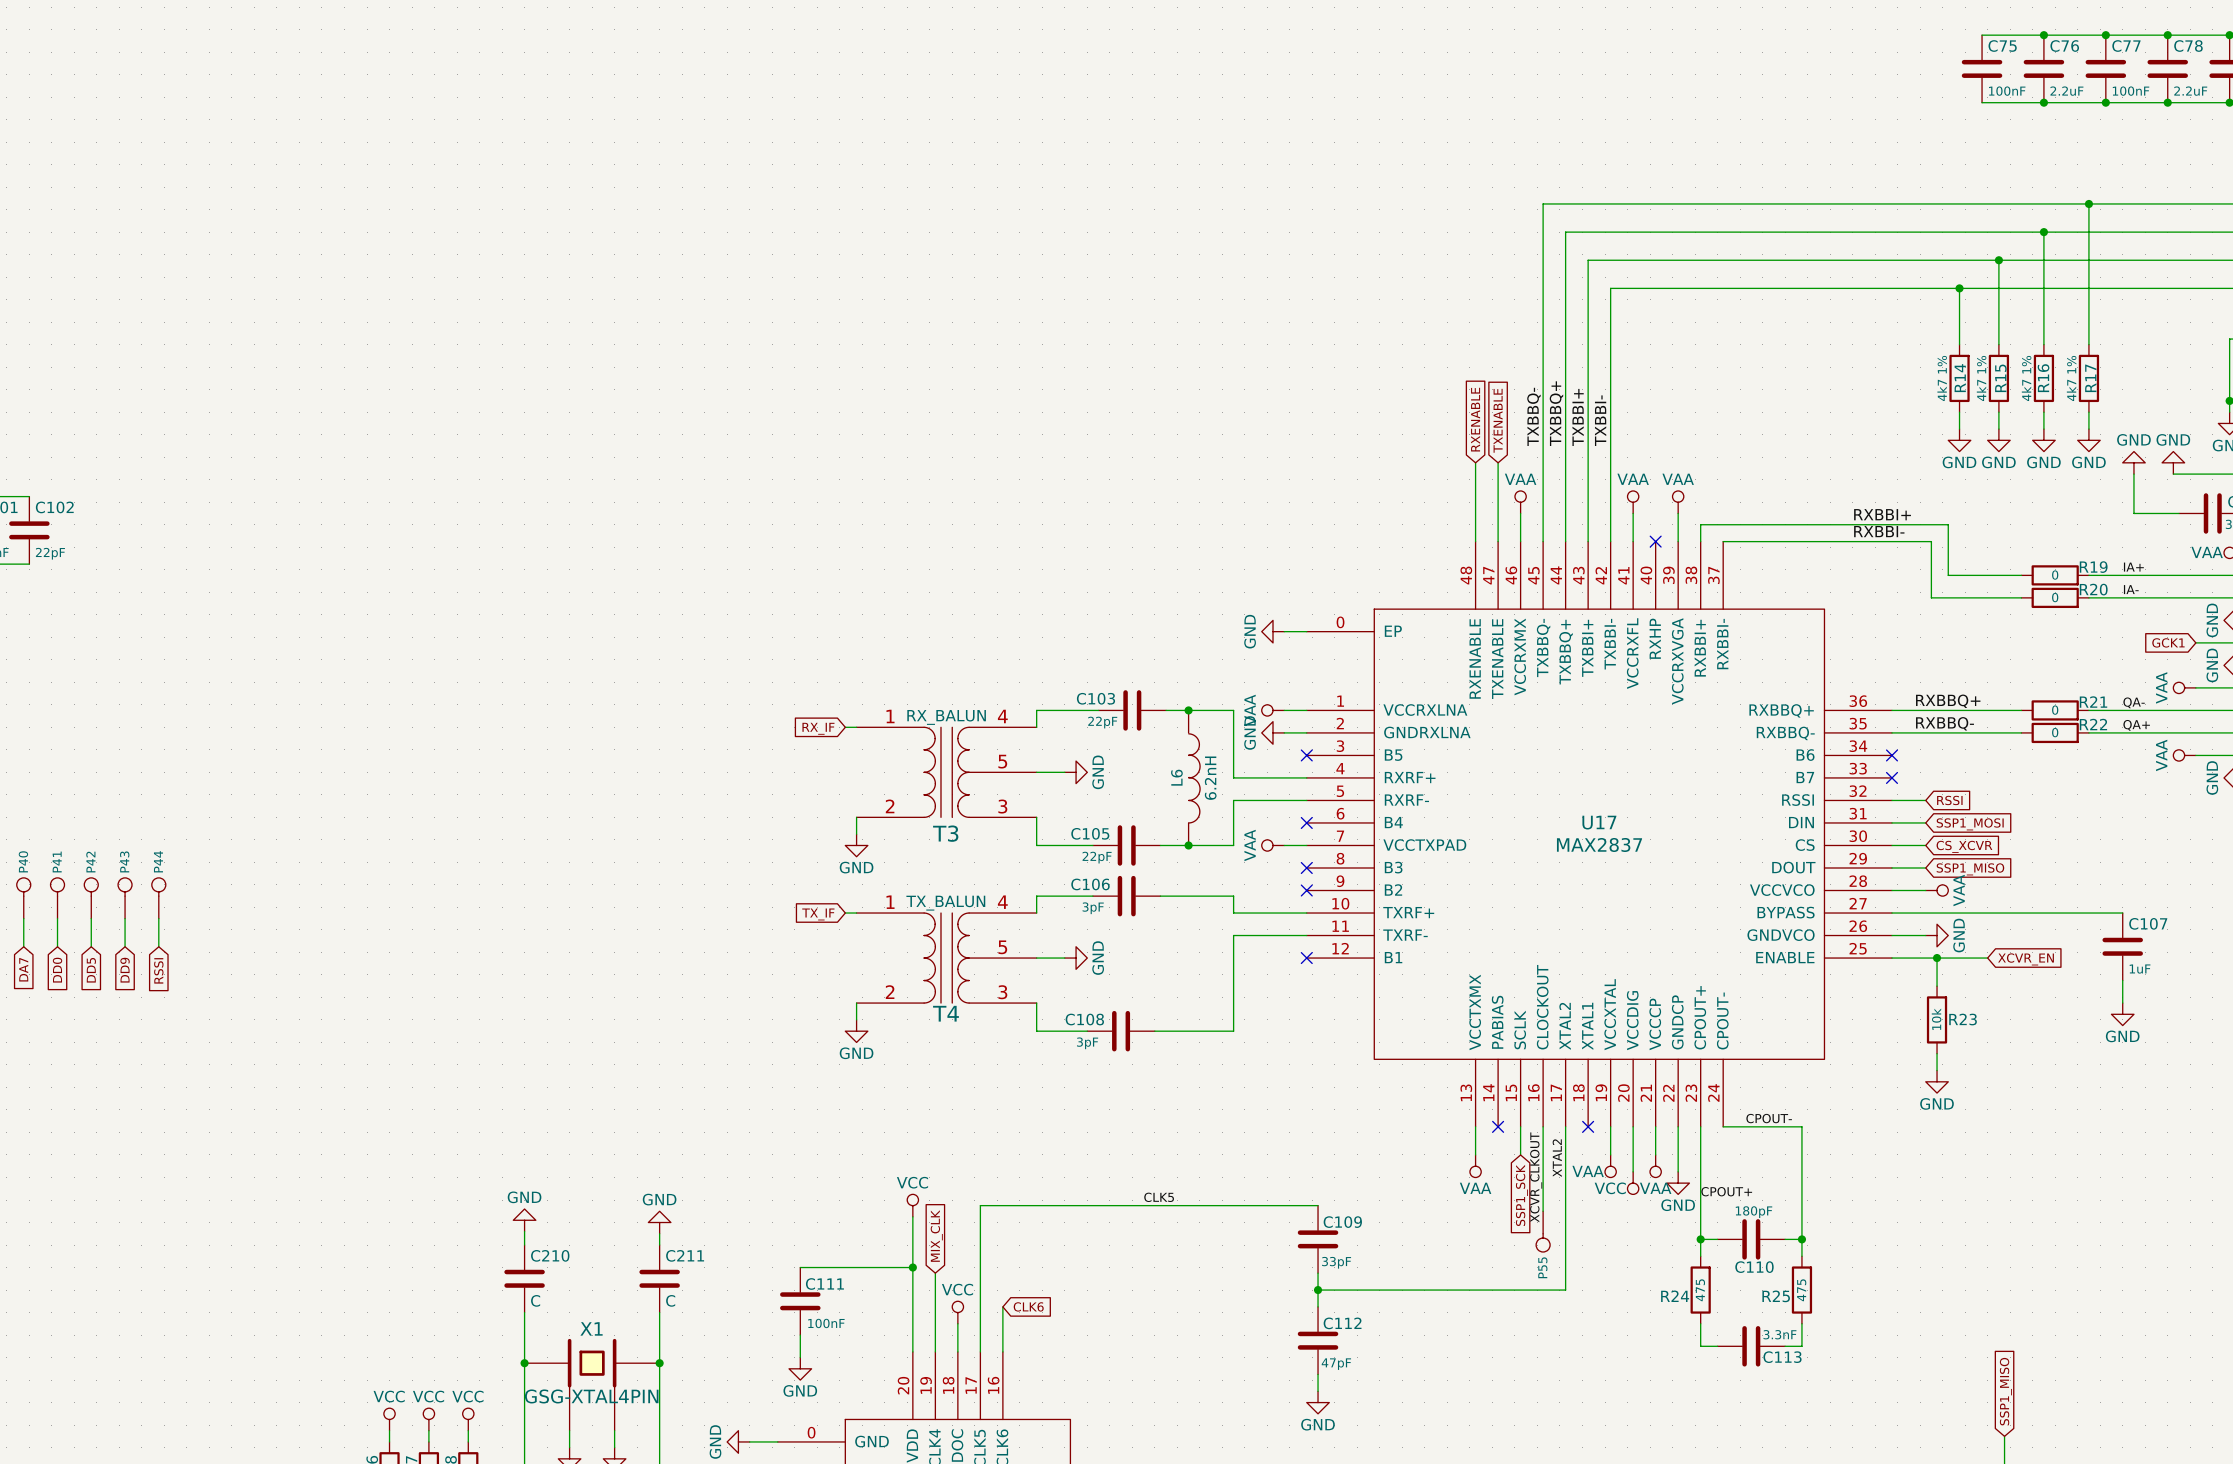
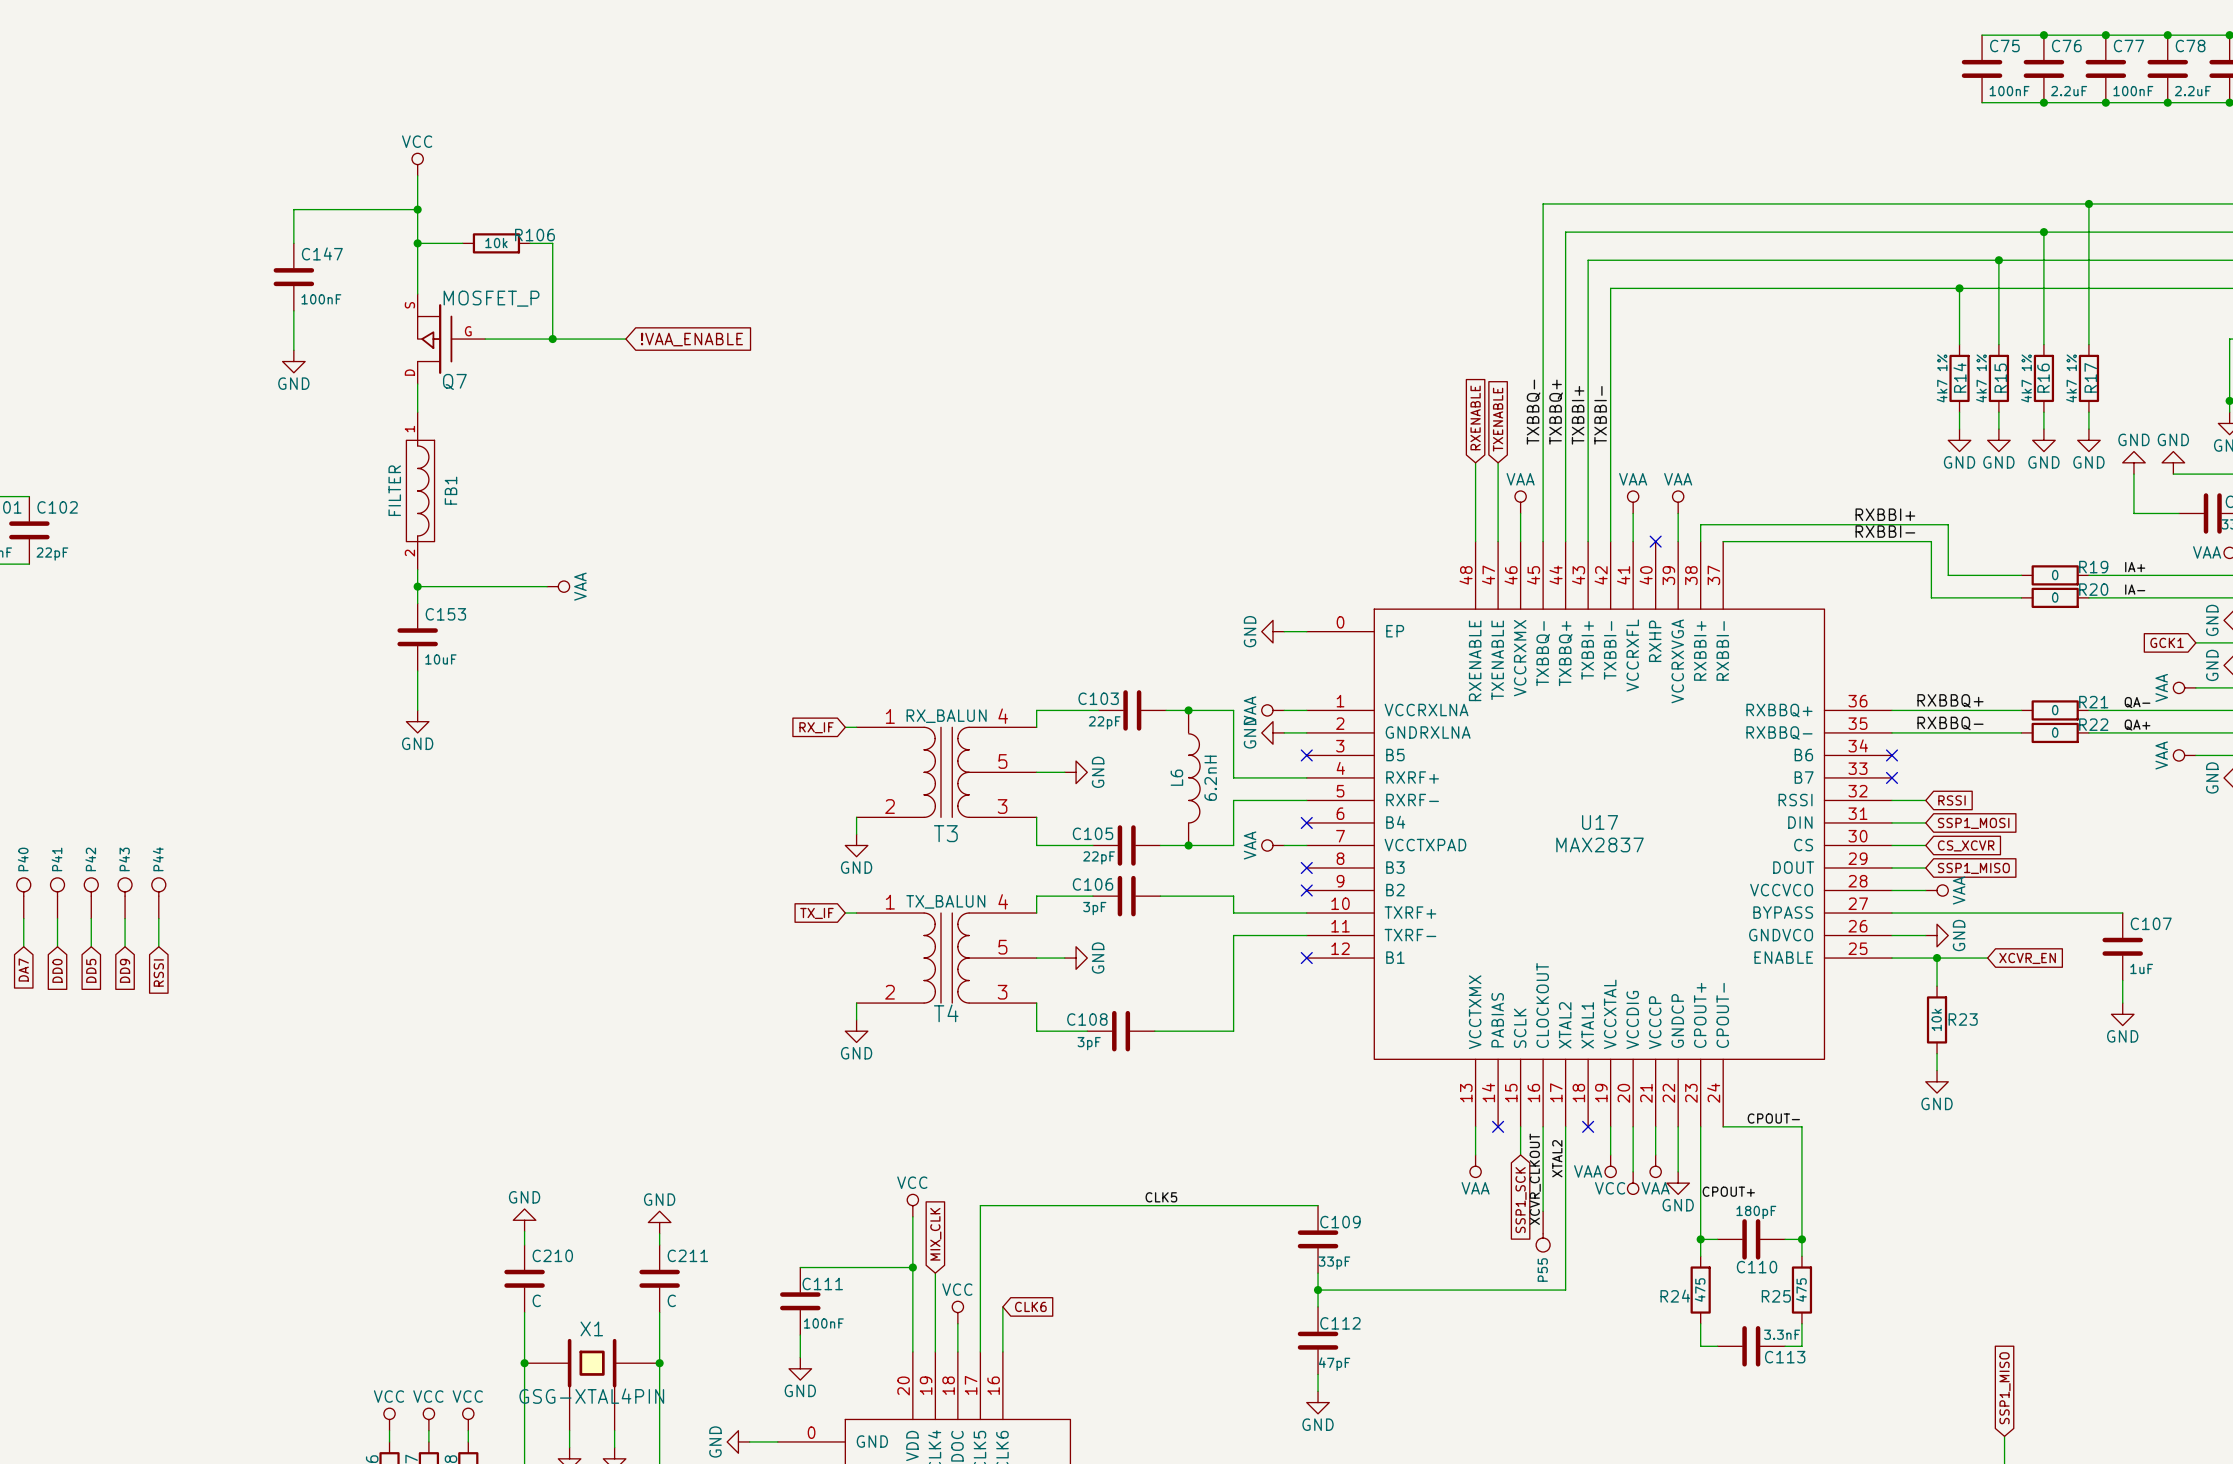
power symbol: none -> VCC (417, 164)
wire: none -> (417, 175) (417, 294)
wire: none -> (417, 209) (293, 209) (293, 243)
junction: none -> (417, 209)
wire: none -> (417, 243) (462, 243)
junction: none -> (417, 243)
R106: none -> 10k (496, 243)
wire: none -> (530, 243) (552, 243) (552, 339)
C147: none -> 100nF (293, 277)
wire: none -> (293, 310) (293, 350)
Q7: none -> MOSFET_P (451, 339)
wire: none -> (485, 339) (625, 339)
junction: none -> (552, 339)
global label: none -> !VAA_ENABLE (691, 339)
power symbol: none -> GND (293, 361)
wire: none -> (417, 384) (417, 412)
FB1: none -> FILTER (420, 490)
wire: none -> (417, 569) (417, 603)
wire: none -> (417, 586) (547, 586)
junction: none -> (417, 586)
power symbol: none -> VAA (558, 586)
C153: none -> 10uF (417, 637)
wire: none -> (417, 671) (417, 710)
power symbol: none -> GND (417, 721)

